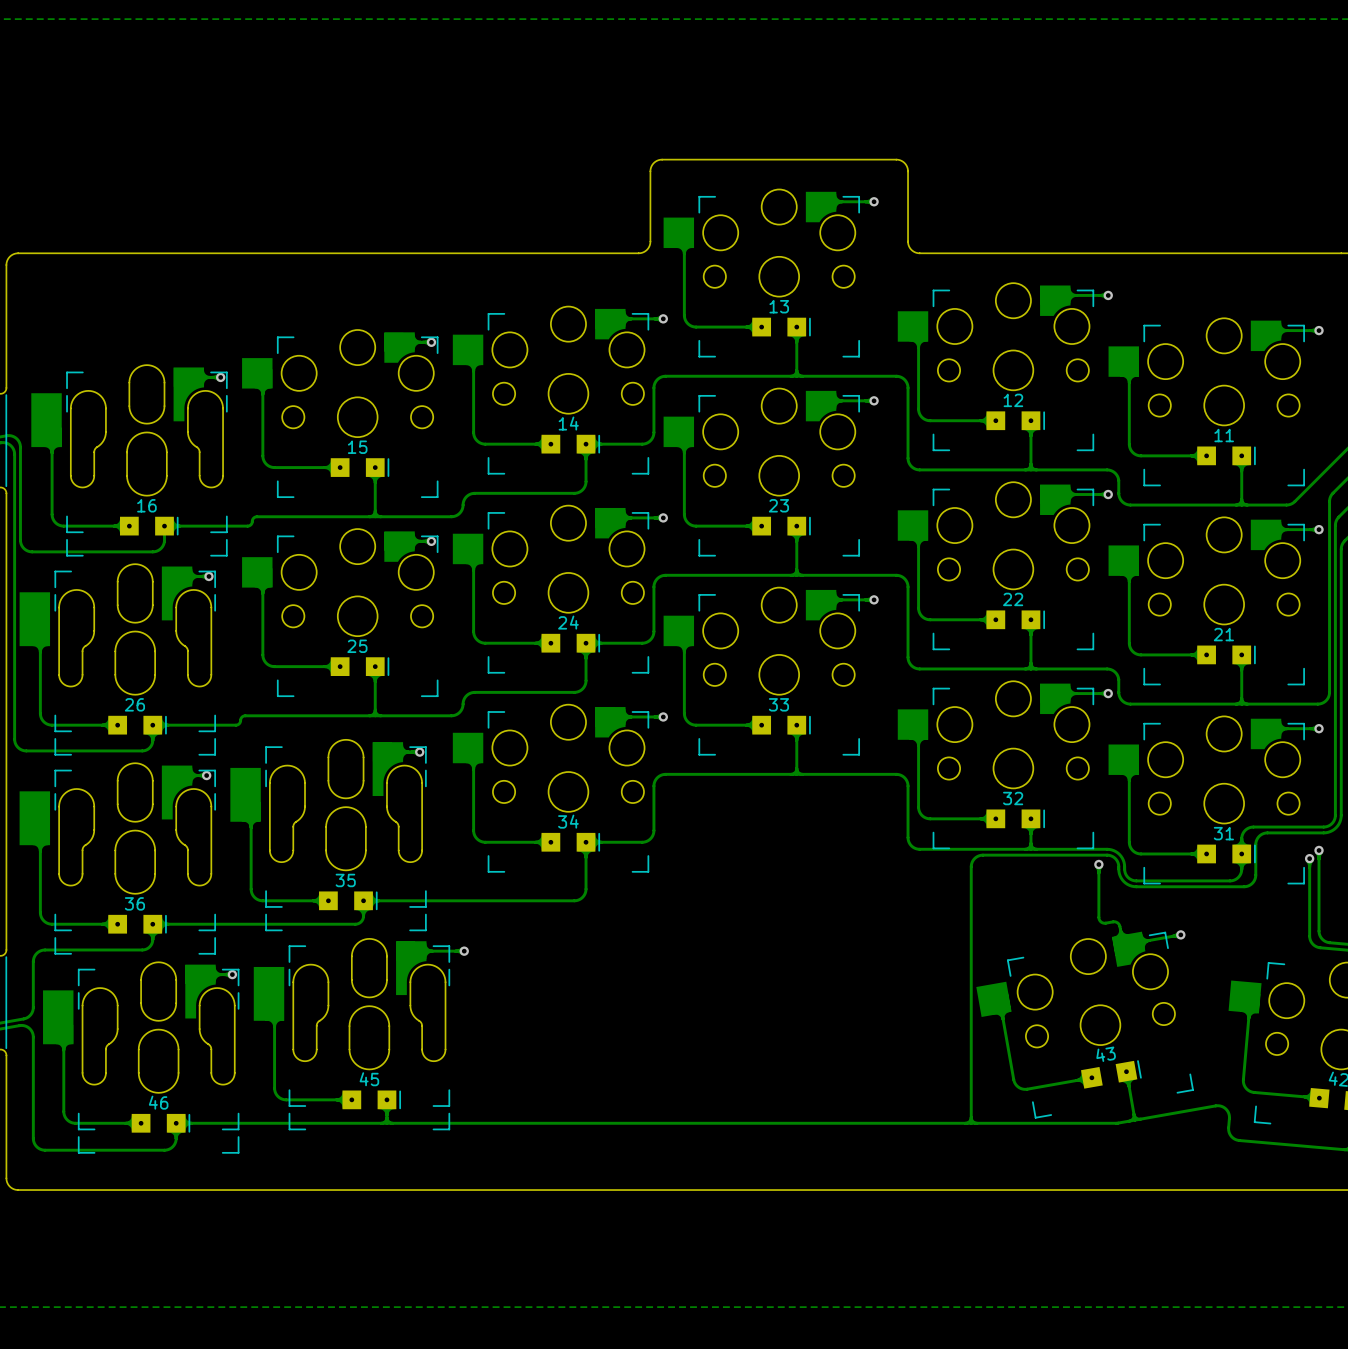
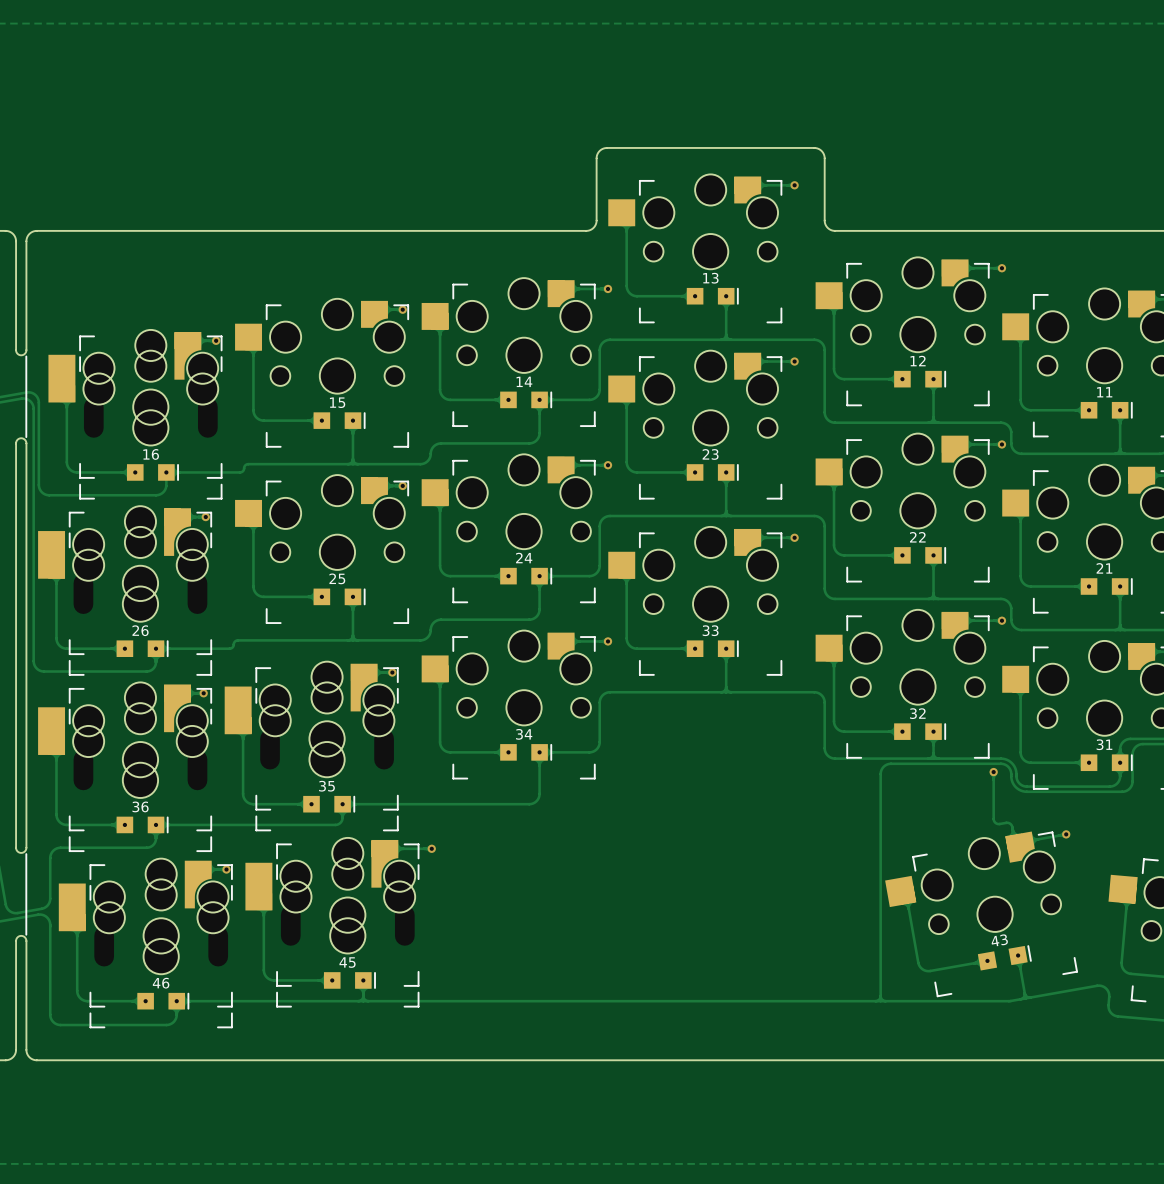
part footprint: [31, 364, 228, 557] -> [48, 329, 223, 500]
part footprint: [19, 563, 217, 756] -> [38, 506, 212, 676]
part footprint: [230, 739, 427, 932] -> [224, 661, 399, 832]
part footprint: [19, 762, 217, 955] -> [38, 682, 212, 852]
part footprint: [253, 938, 451, 1131] -> [245, 837, 420, 1008]
part footprint: [43, 961, 240, 1154] -> [58, 858, 233, 1029]

